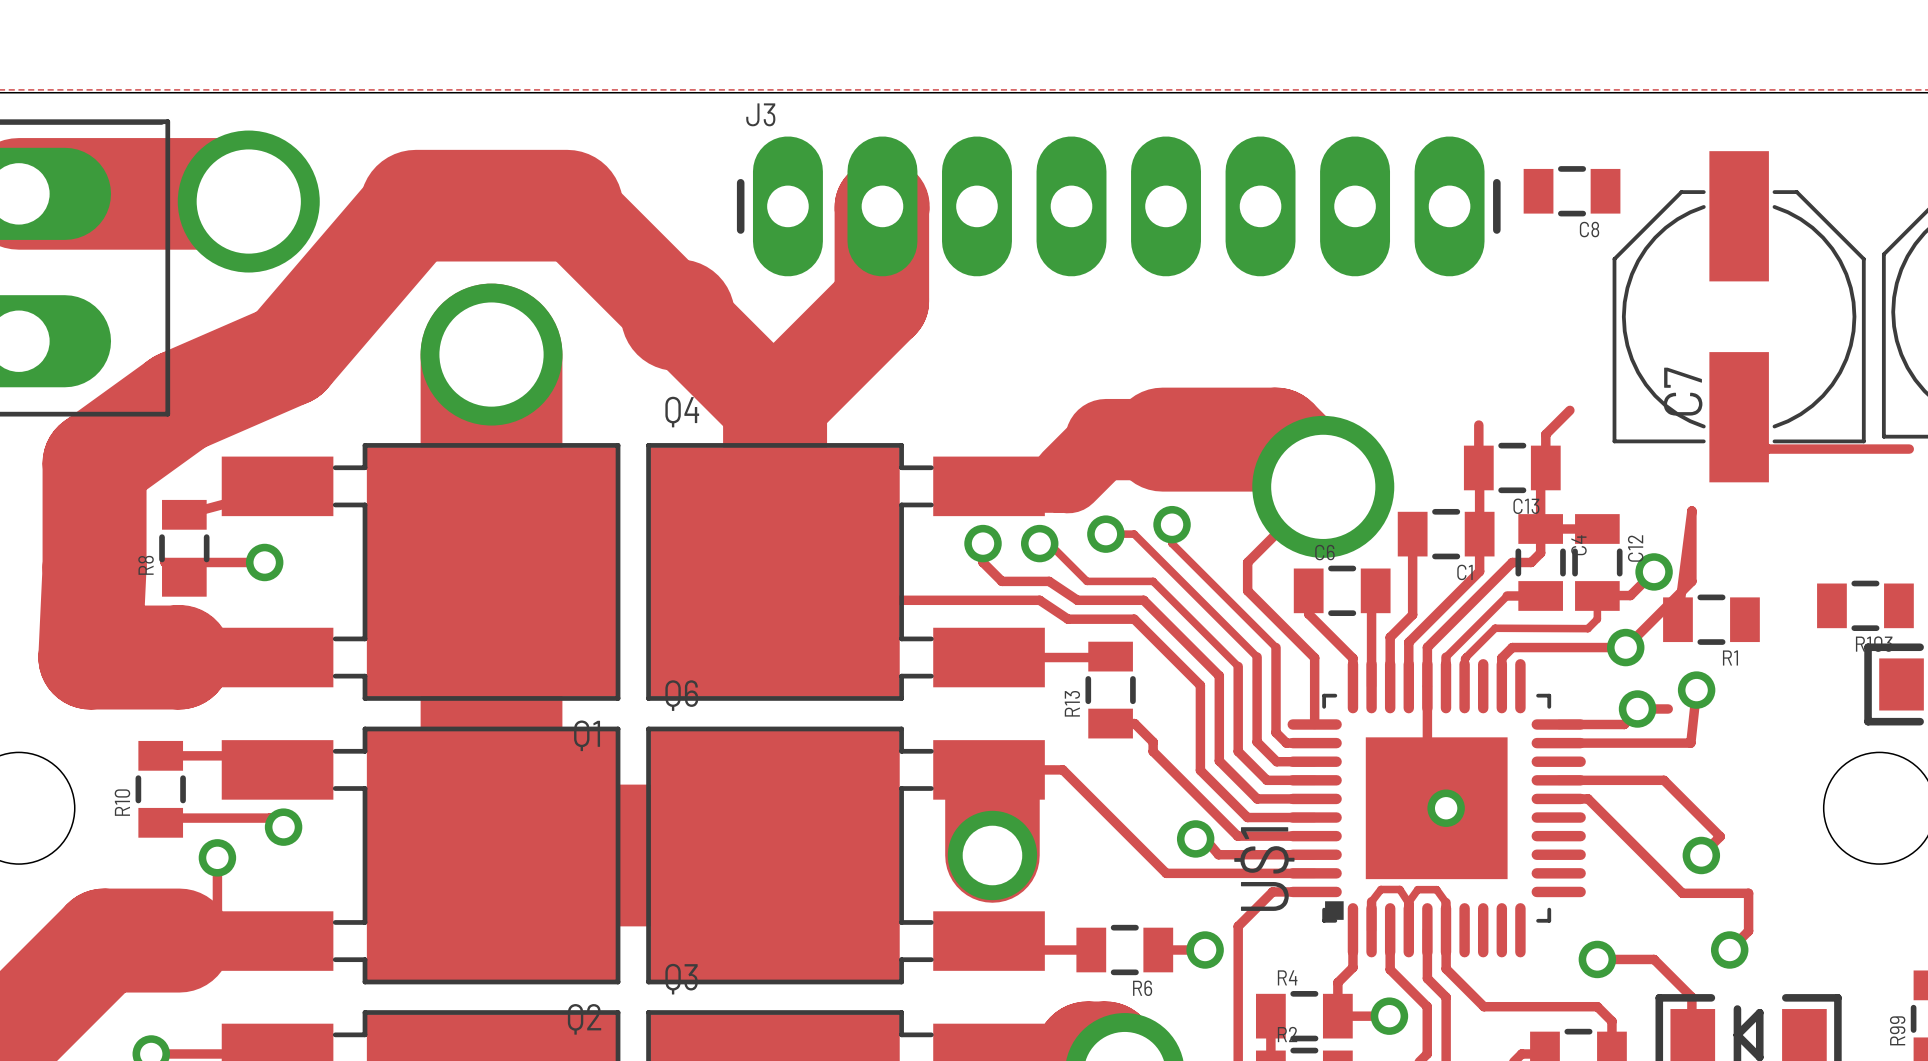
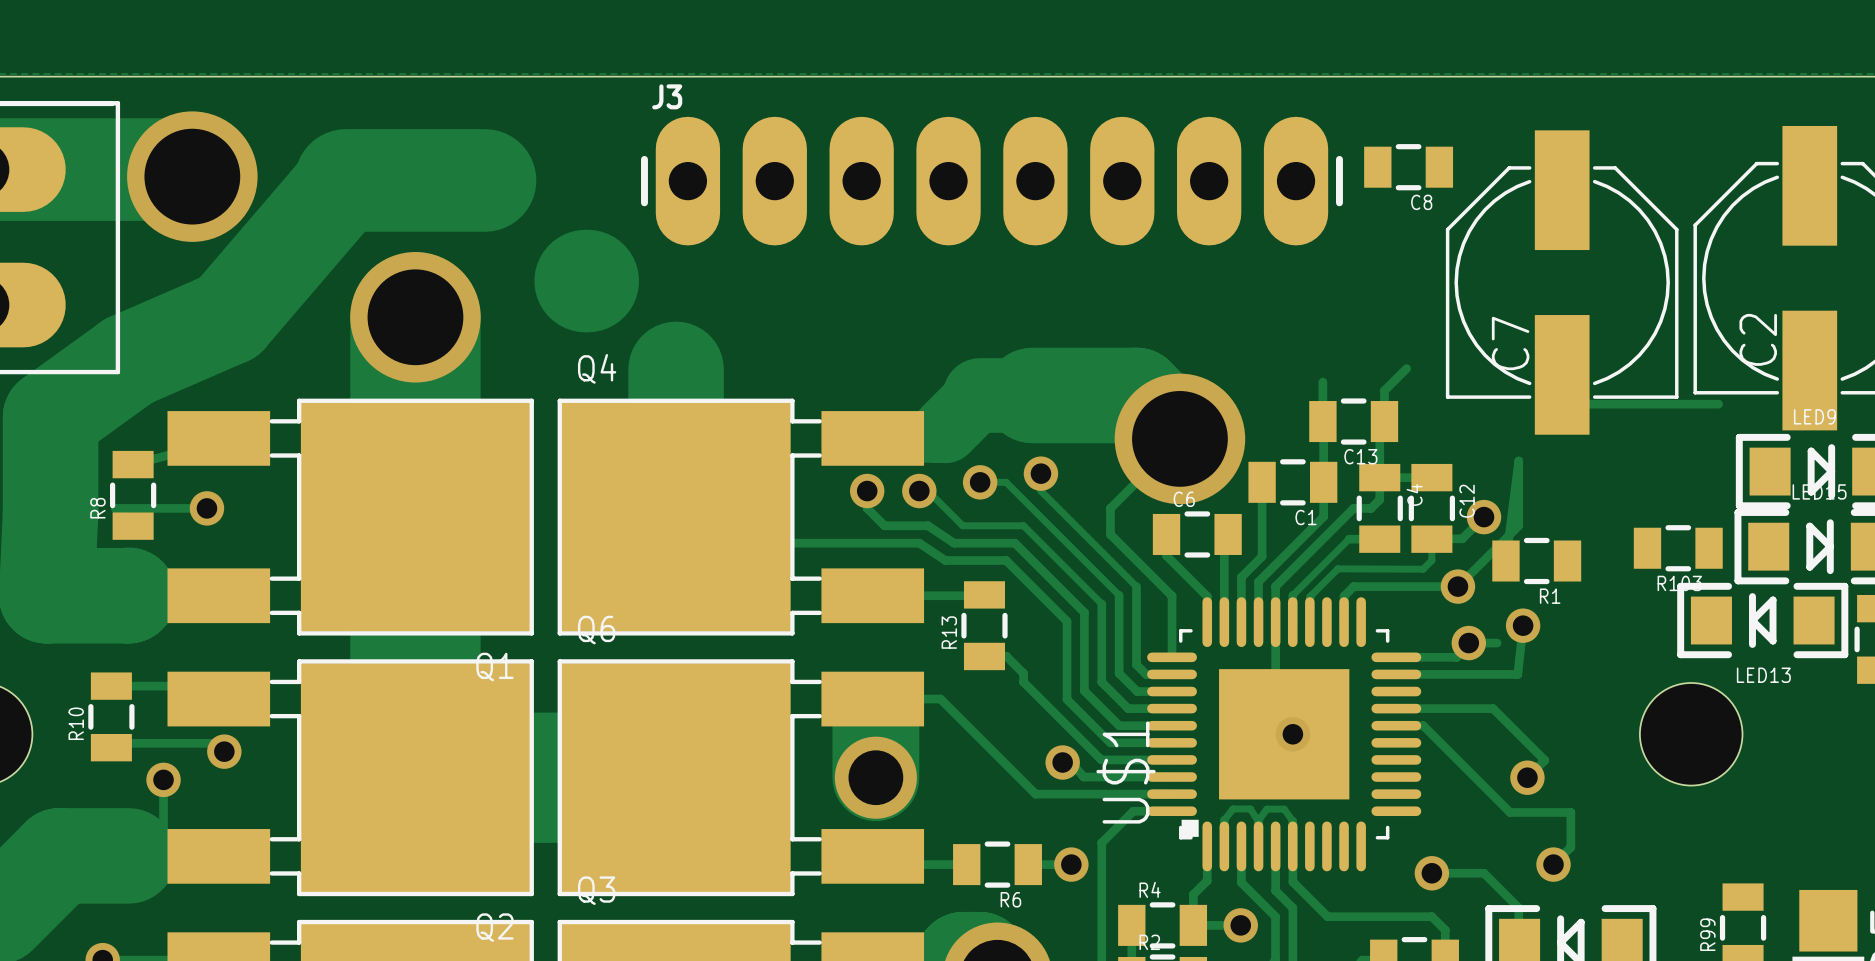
track: (567, 205) (775, 411) (775, 408) (881, 301) (882, 206) -> none

